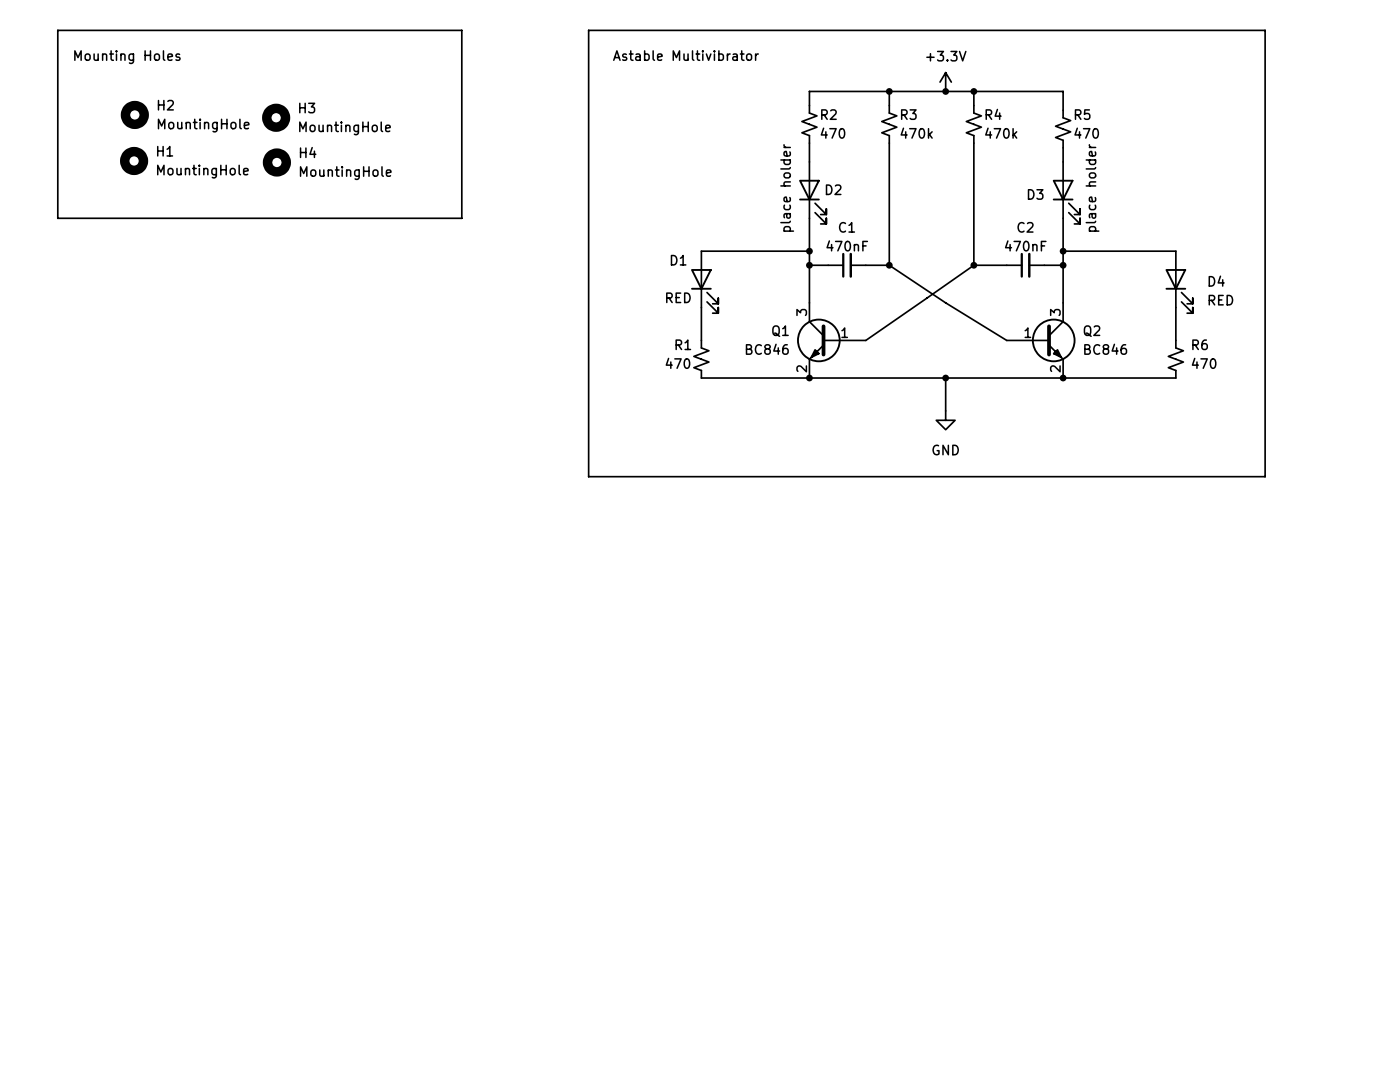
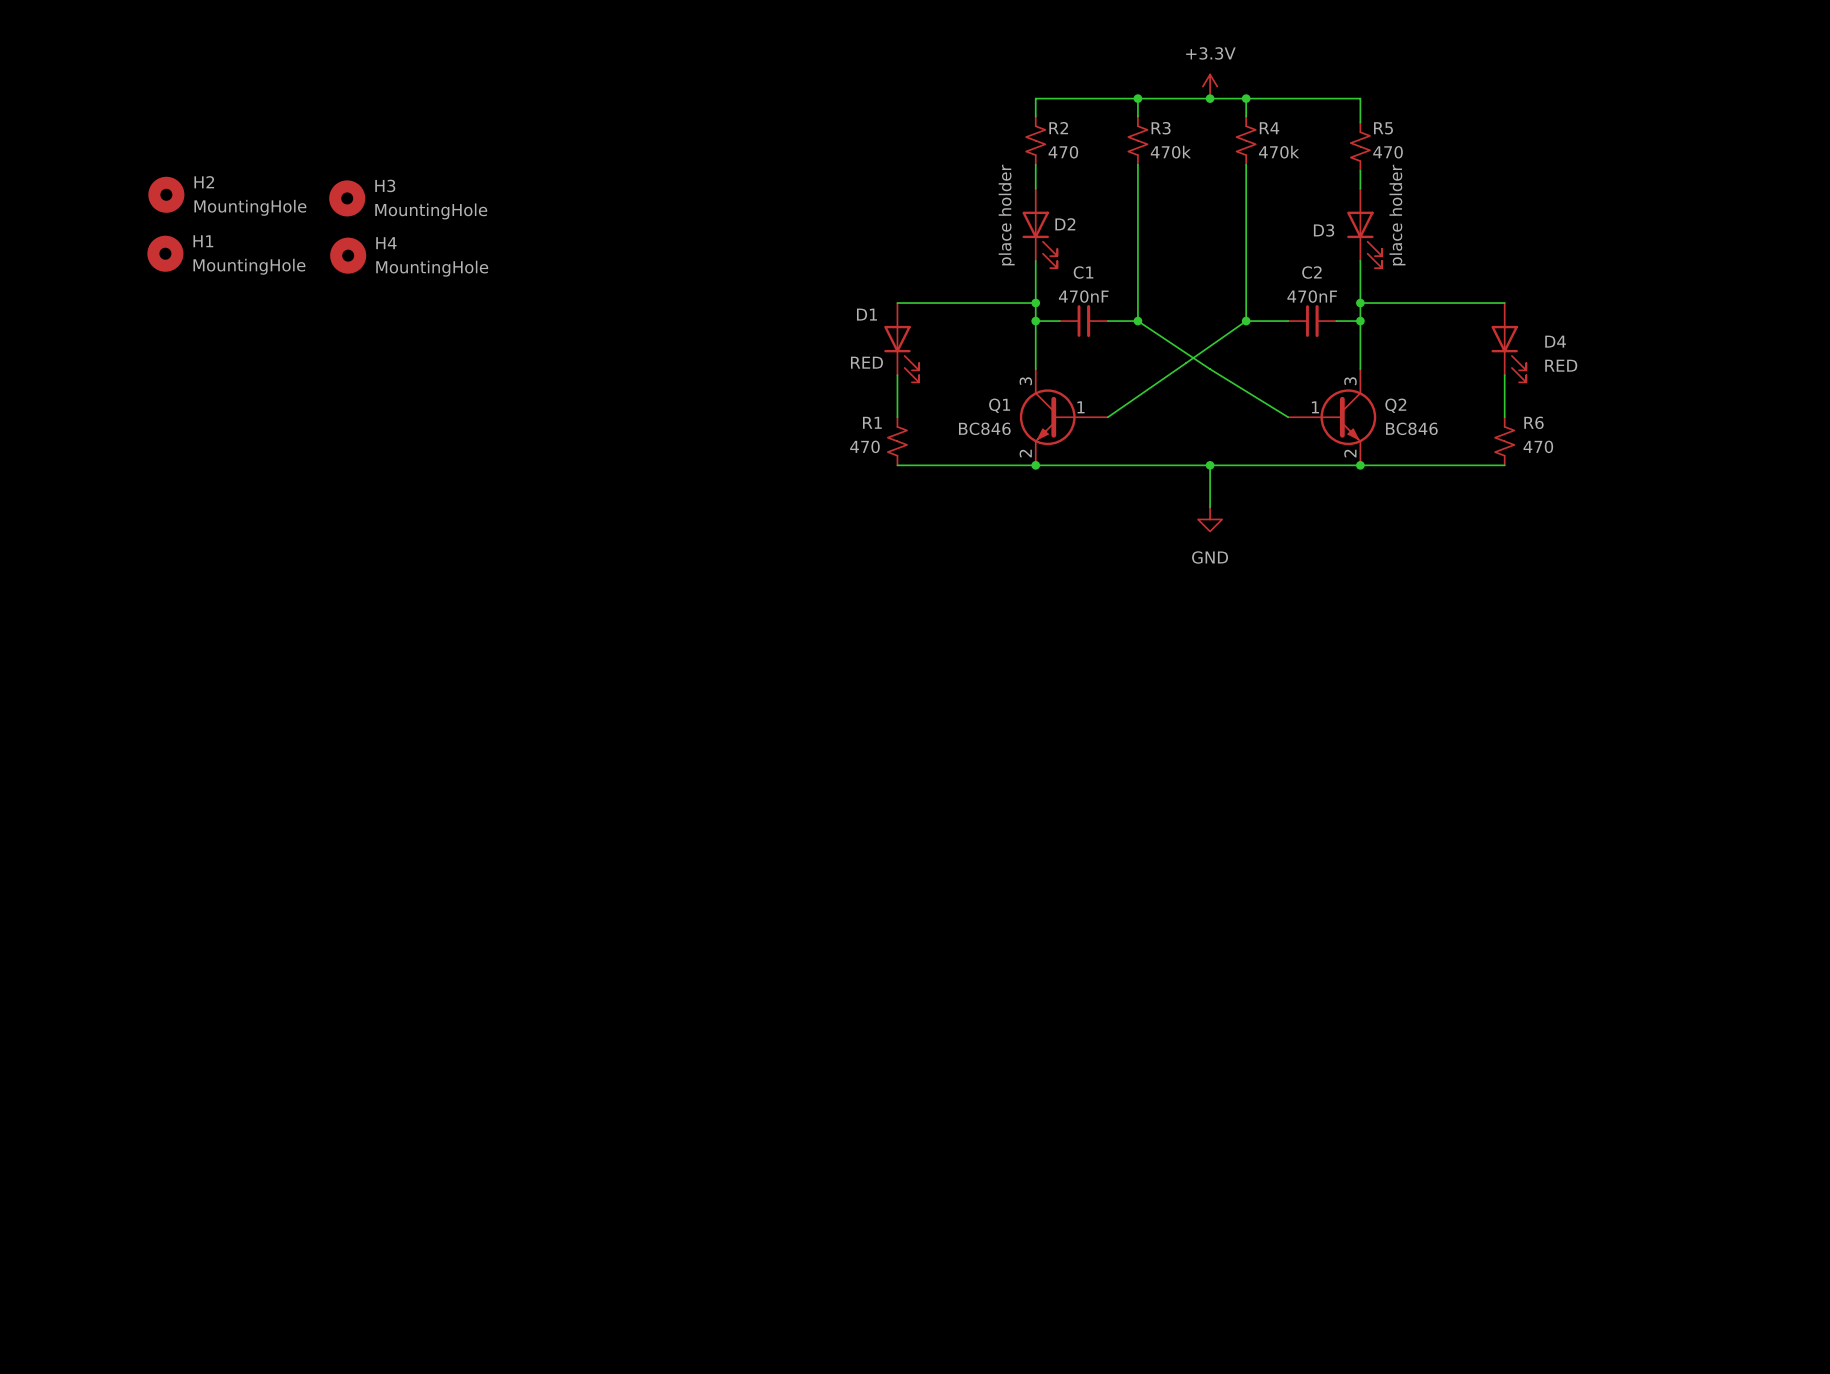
line: (57, 30) (57, 218) (461, 218) (461, 30) (57, 30) -> none
line: (588, 30) (1265, 30) (1265, 476) (588, 476) (588, 30) -> none
text: Astable Multivibrator (686, 55) -> none
text: Mounting Holes (127, 57) -> none
H2 position: (134, 114) -> (166, 194)
H3 position: (276, 117) -> (347, 198)
H1 position: (134, 160) -> (165, 253)
H4 position: (276, 162) -> (348, 255)

